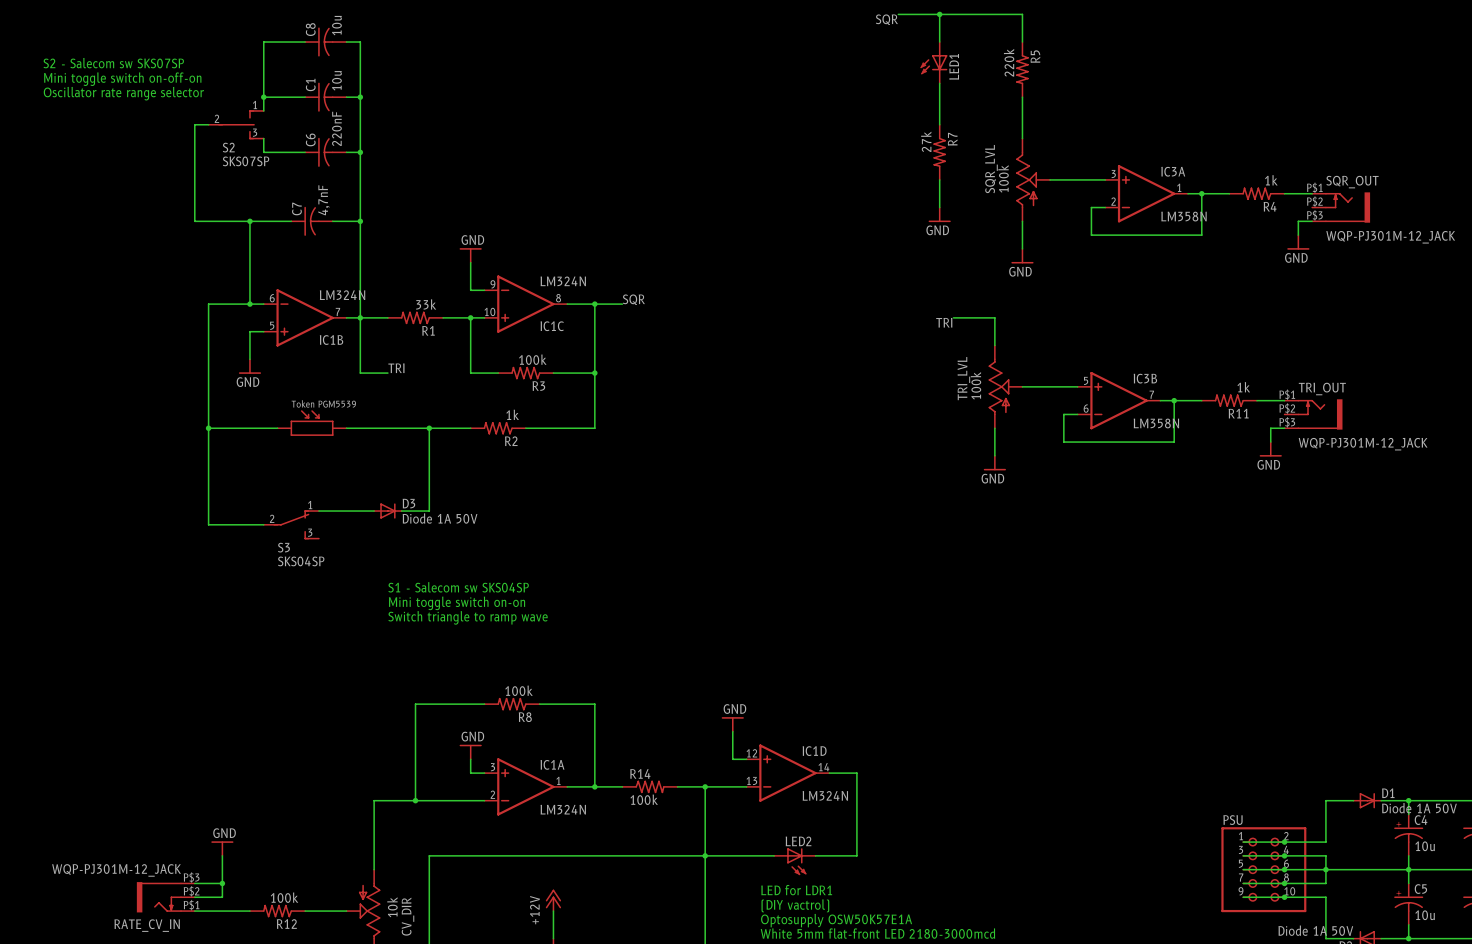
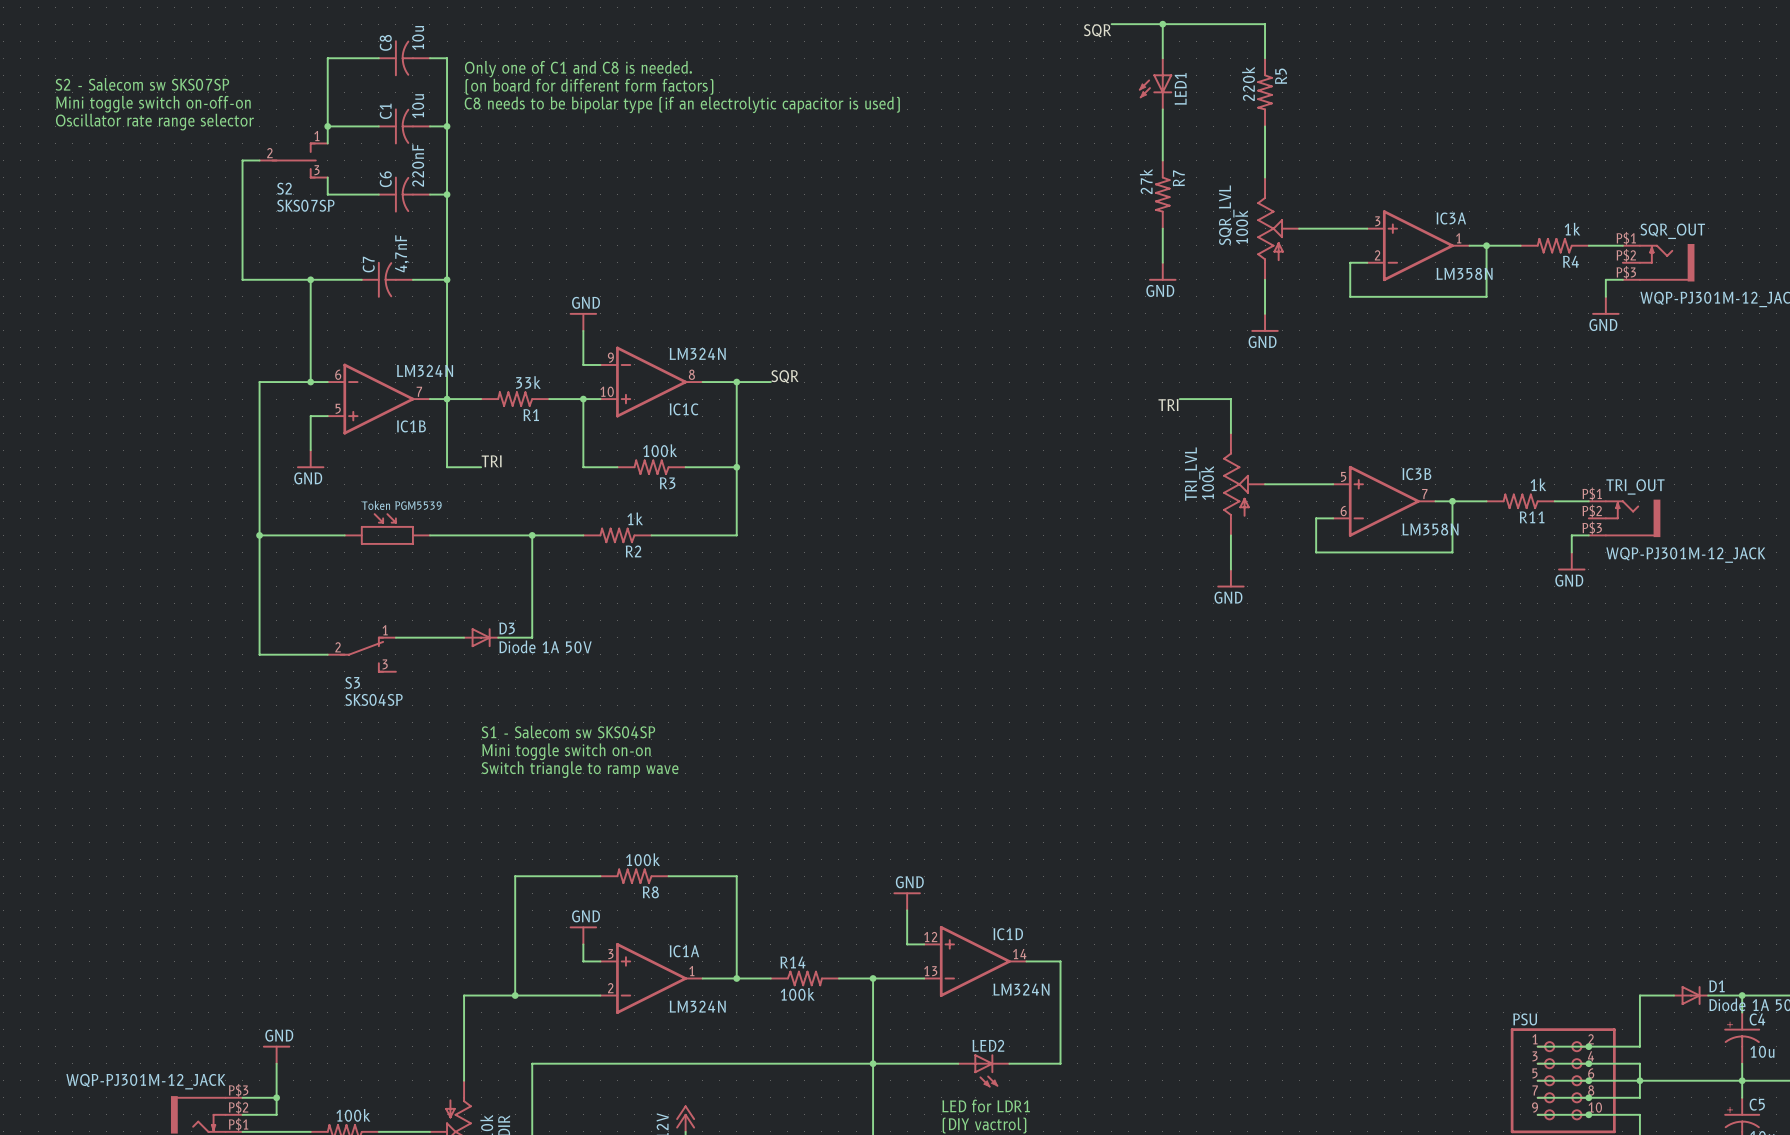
text: none -> Only one of C1 and C8 is needed. (578, 69)
text: none -> (on board for different form factors) (589, 86)
text: none -> C8 needs to be bipolar type (if an electrolytic capacitor is used) (682, 104)

